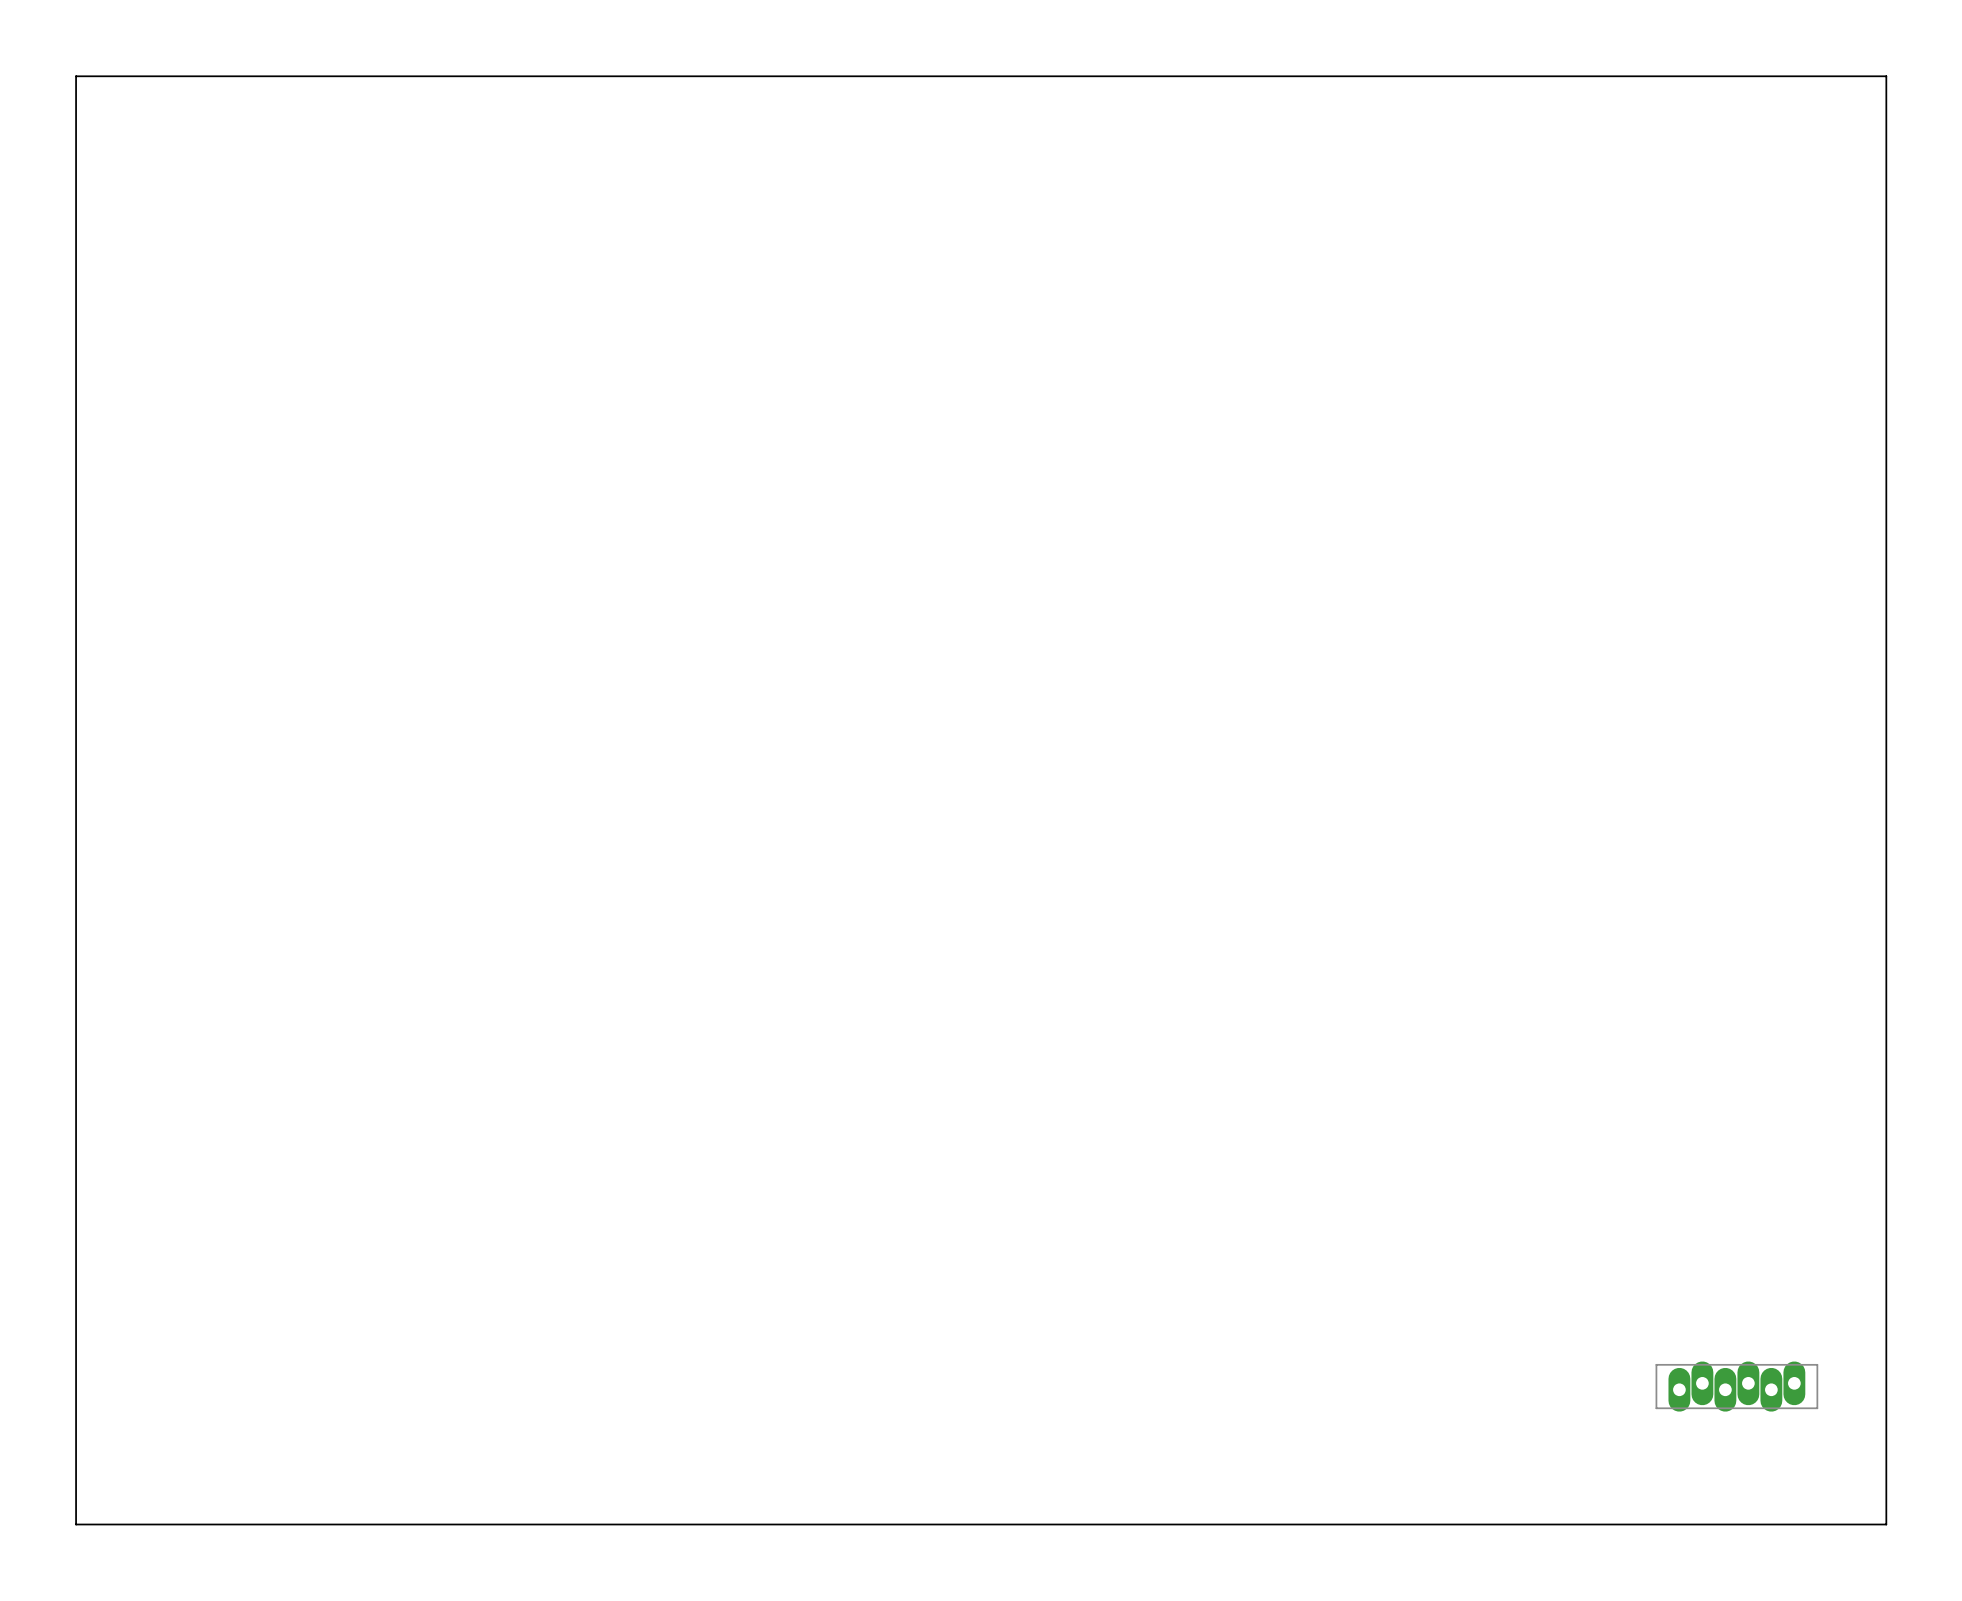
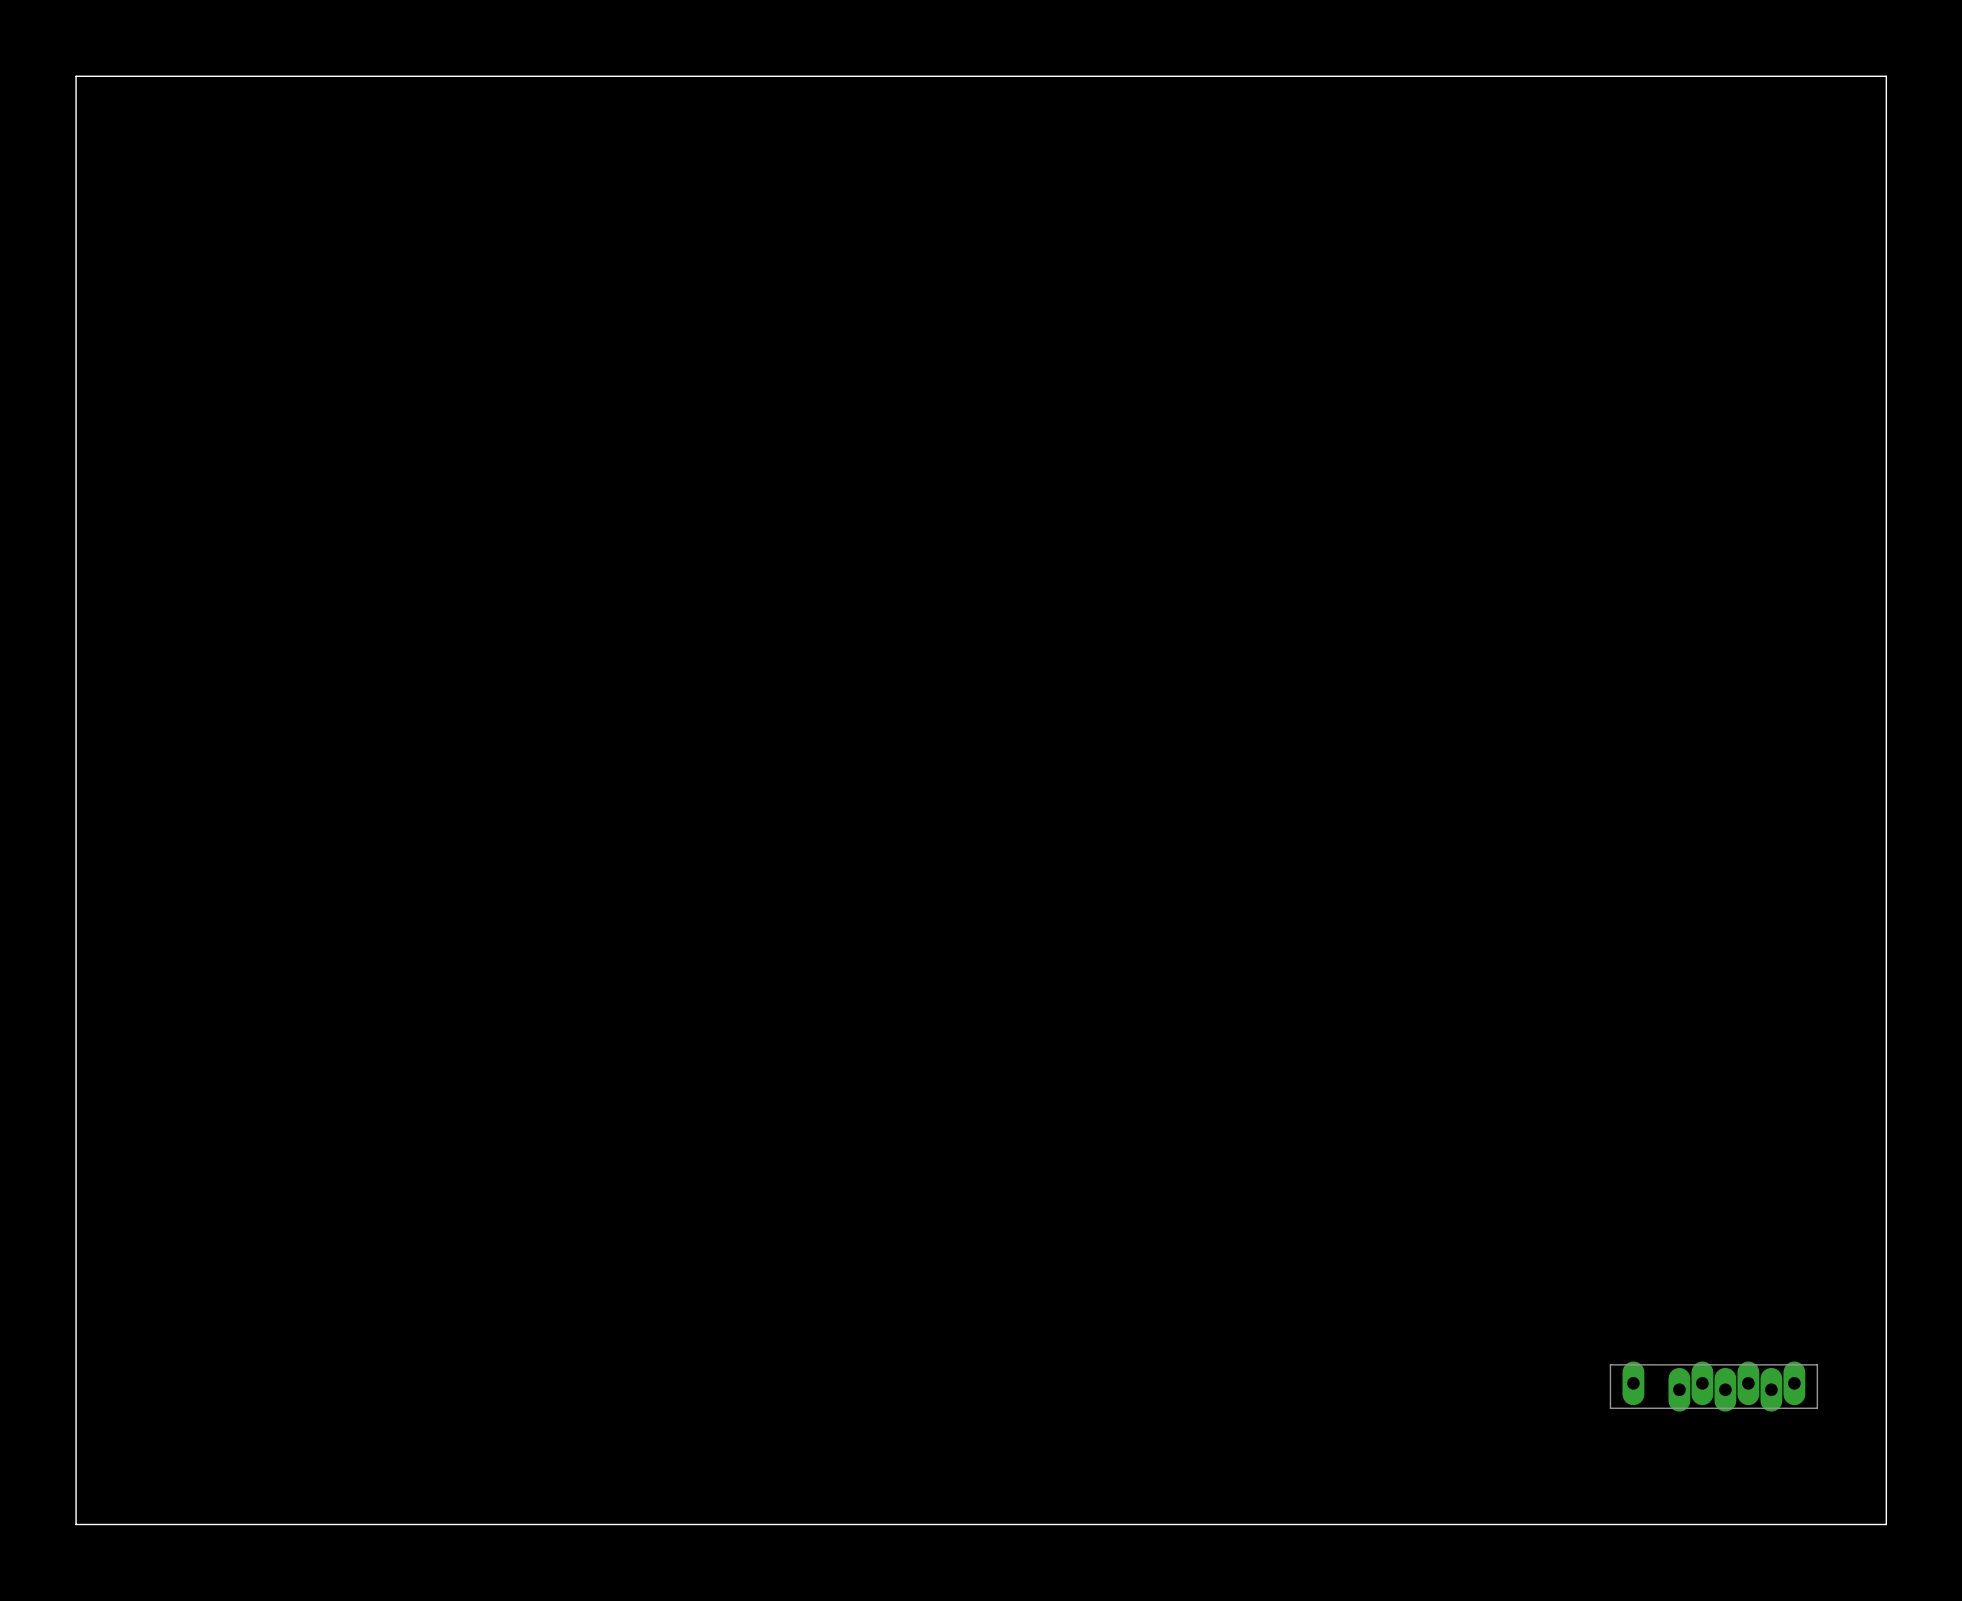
part: none -> (1713, 1386)
part: (1736, 1386) -> none

